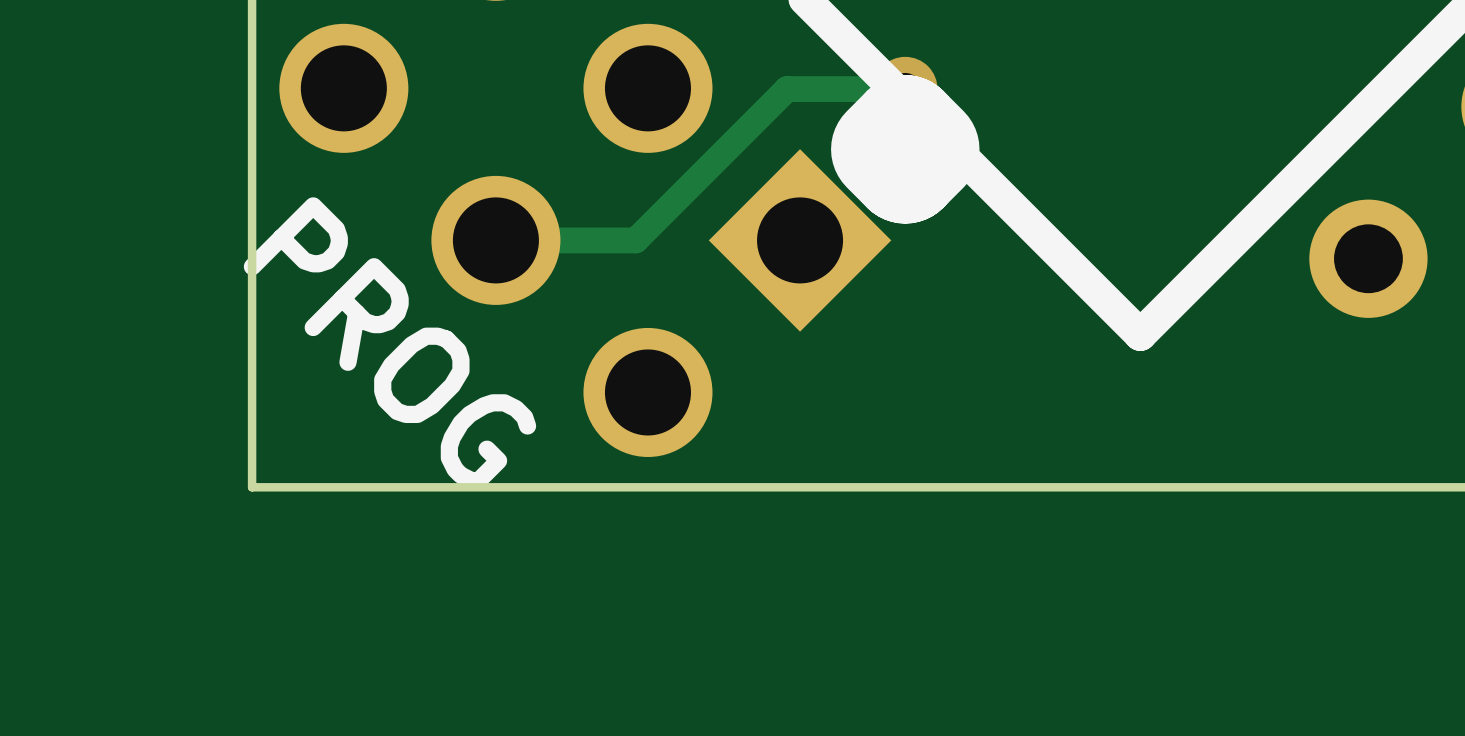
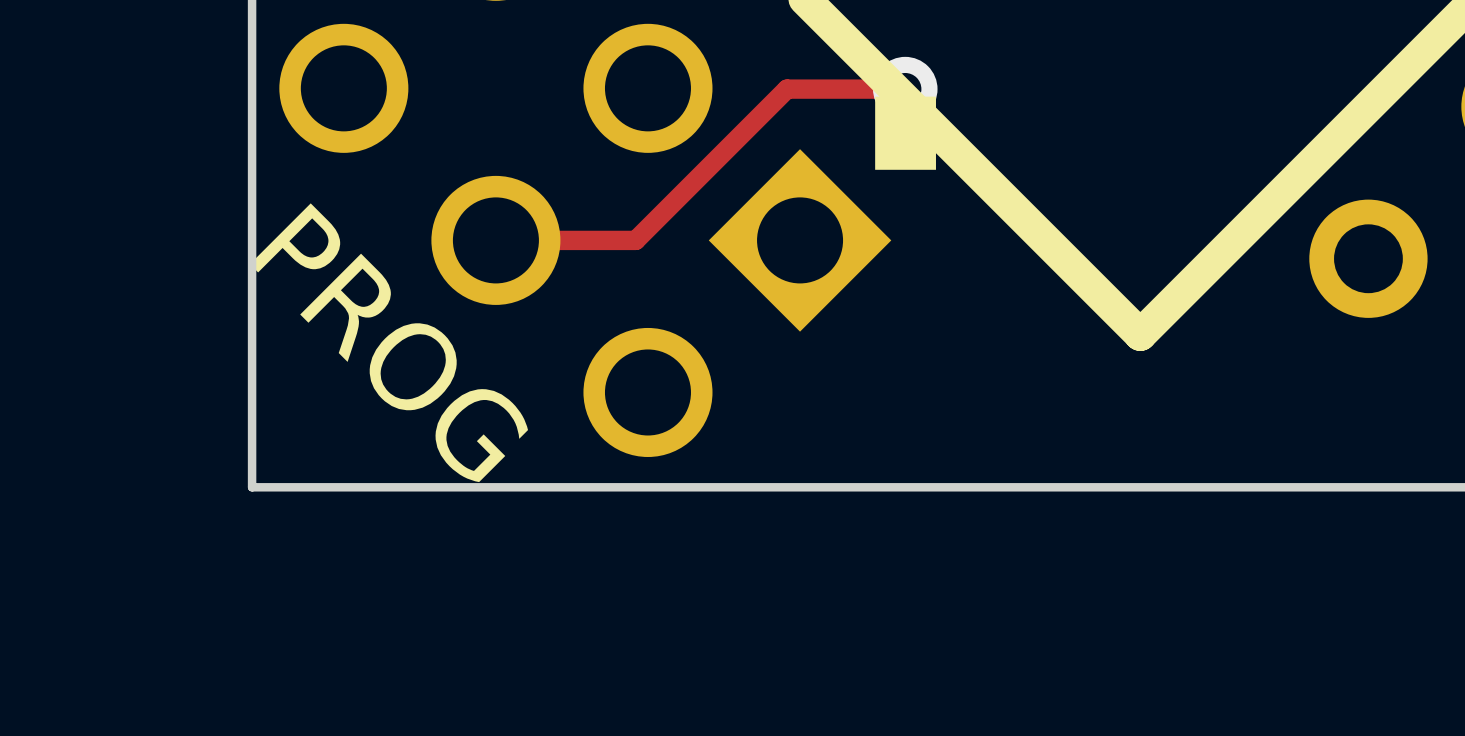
track width: thick (905, 89) (786, 89) (635, 240) (495, 240) -> thin (905, 89) (786, 89) (635, 240) (495, 240)

